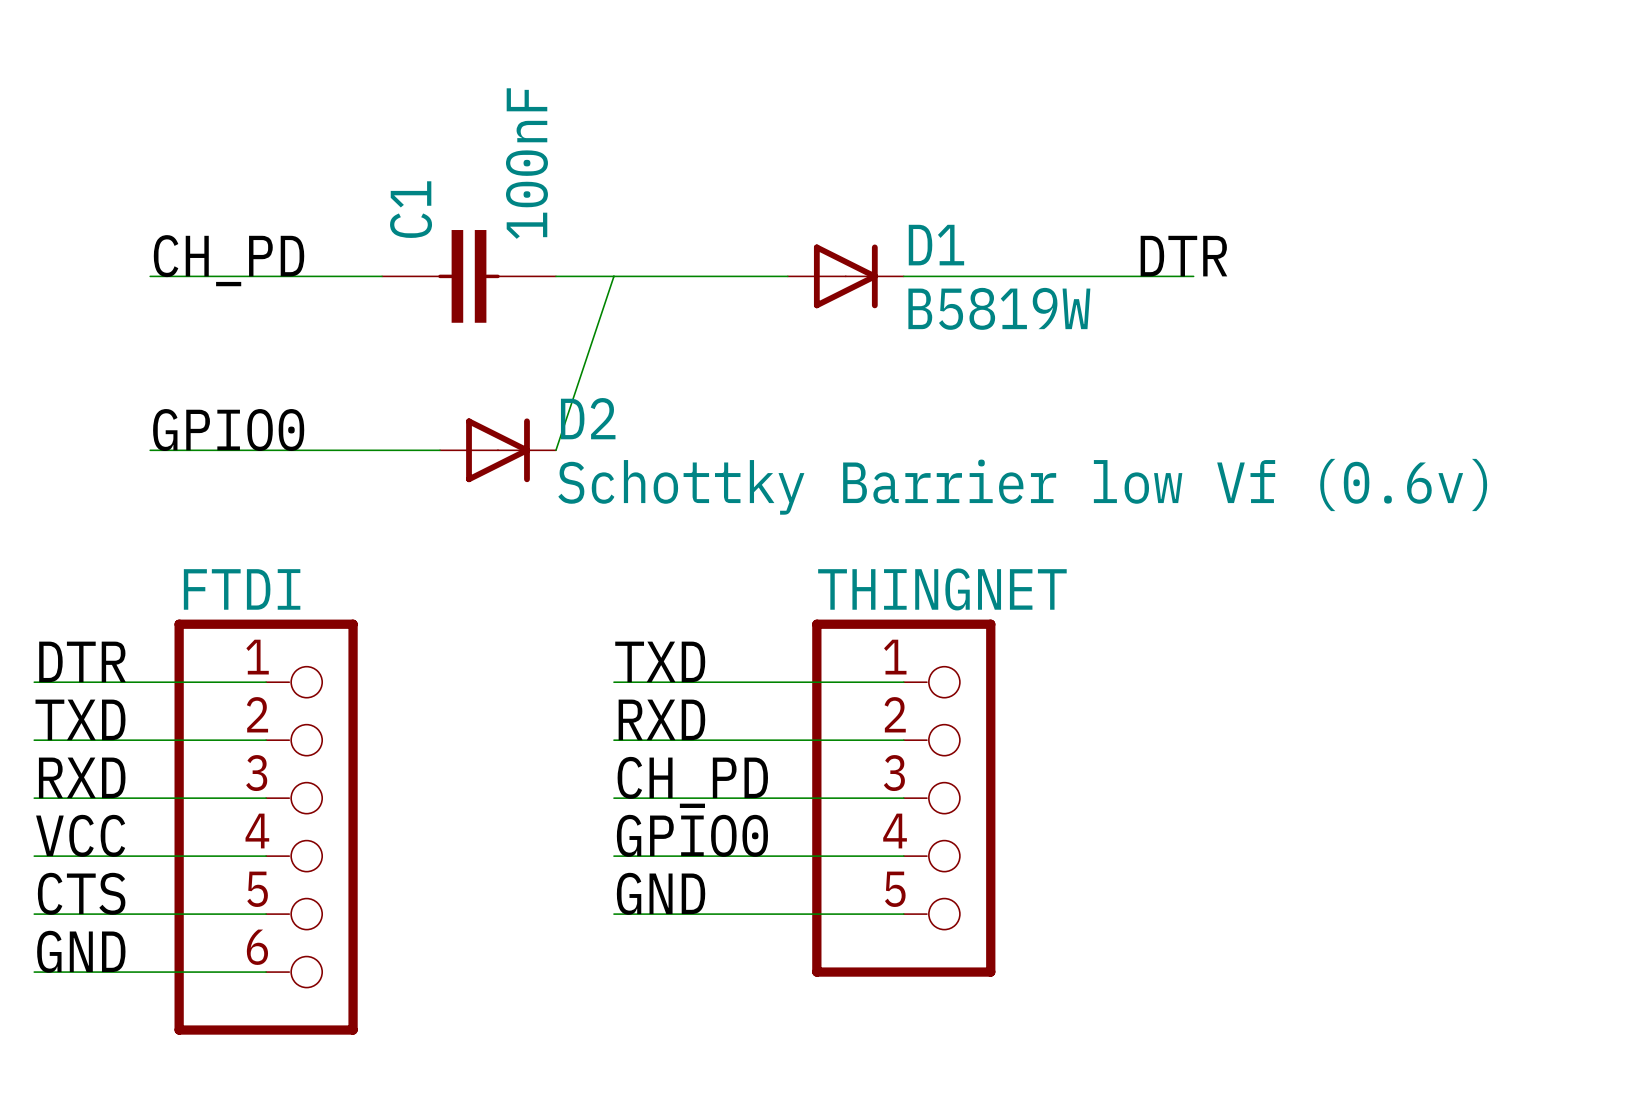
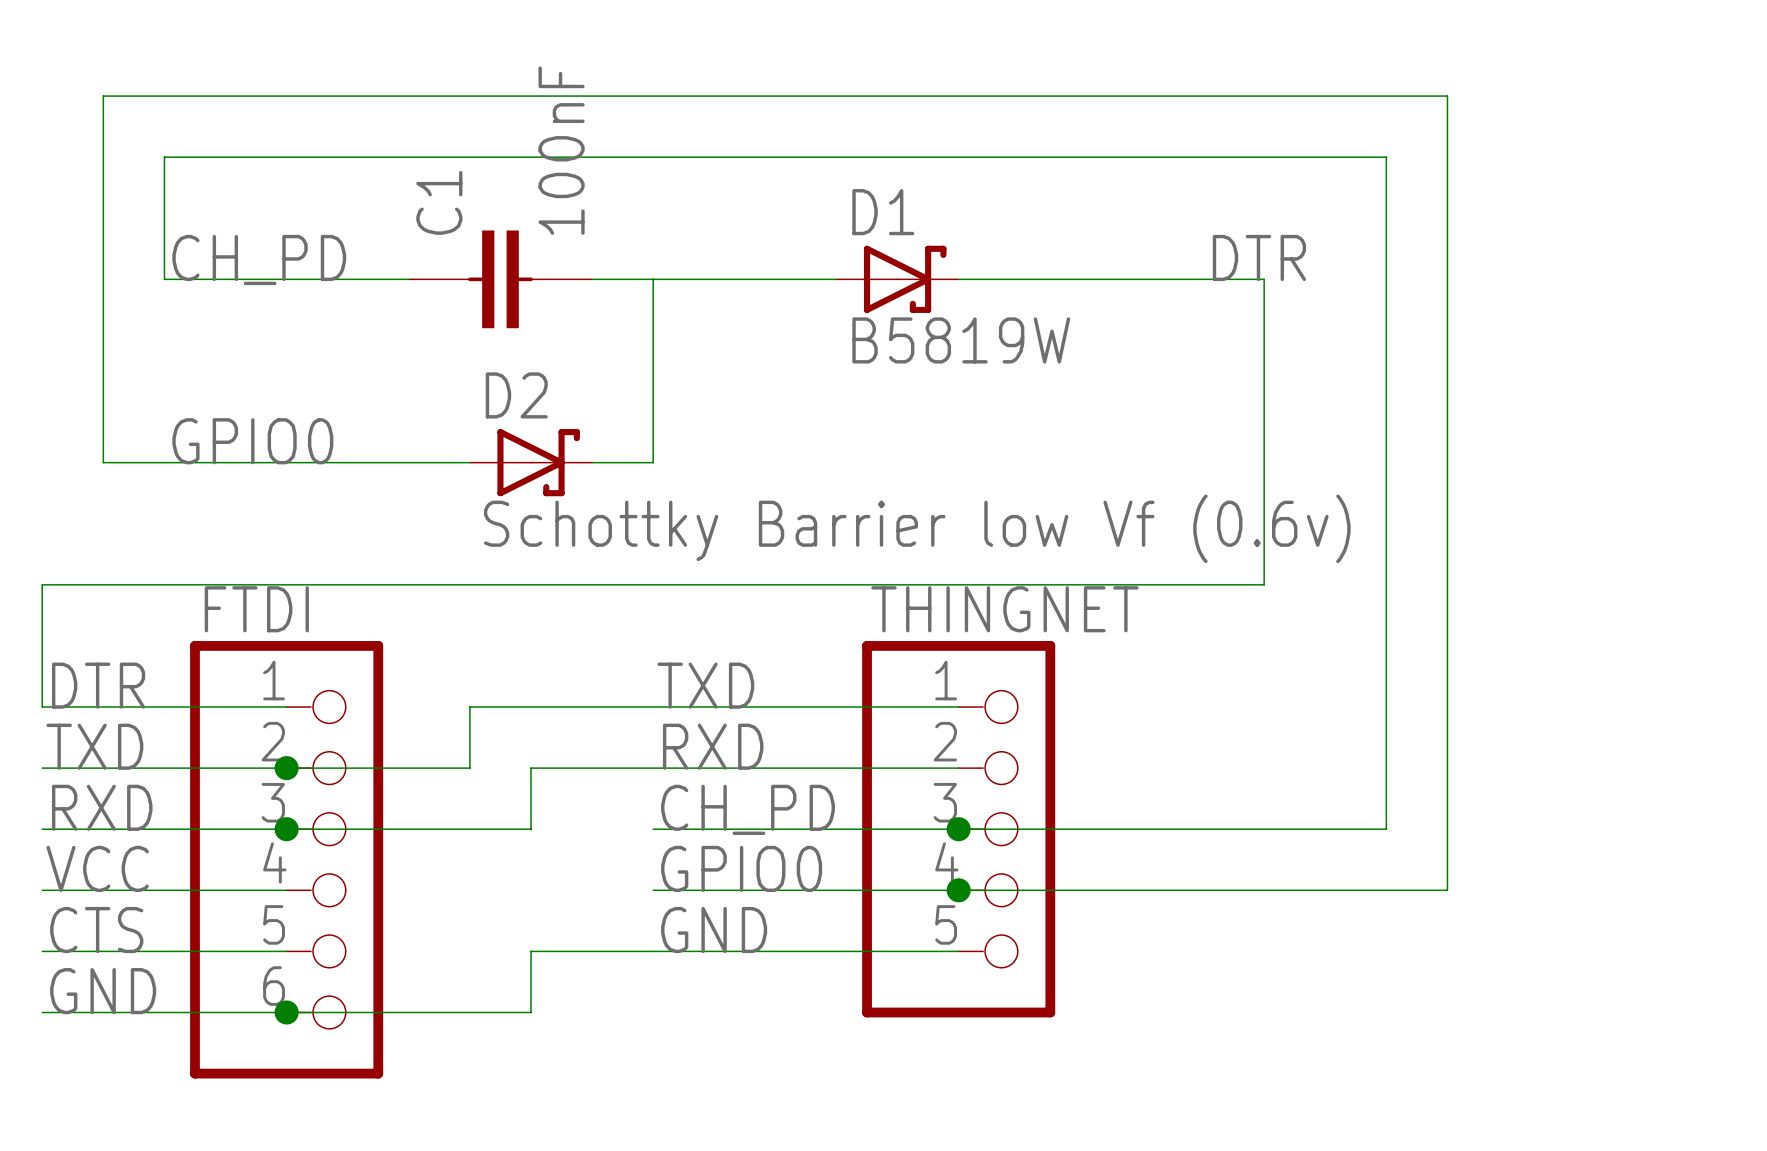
D1 symbol: [787, 244, 904, 309] -> [836, 245, 959, 313]
D1 name position: D1 (936, 245) -> D1 (883, 212)
wire: none -> (164, 279) (164, 157) (1386, 157) (1386, 829) (958, 829)
wire: (613, 276) (555, 450) -> (653, 279) (653, 462) (592, 462)
wire: none -> (1264, 279) (1264, 584) (42, 584) (42, 707)
D1 value position: B5819W (999, 308) -> B5819W (961, 340)
D2 symbol: [440, 418, 556, 483] -> [469, 429, 593, 497]
D2 name position: D2 (588, 418) -> D2 (516, 395)
wire: none -> (164, 462) (103, 462) (103, 96) (1447, 96) (1447, 890) (958, 890)
D2 value position: Schottky Barrier low Vf (0.6v) (1022, 486) -> Schottky Barrier low Vf (0.6v) (917, 528)
wire: none -> (653, 707) (469, 707) (469, 768) (286, 768)
junction: none -> (286, 768)
wire: none -> (653, 768) (531, 768) (531, 829) (286, 829)
junction: none -> (286, 829)
junction: none -> (958, 829)
junction: none -> (958, 890)
wire: none -> (653, 951) (531, 951) (531, 1012) (286, 1012)
junction: none -> (286, 1012)

